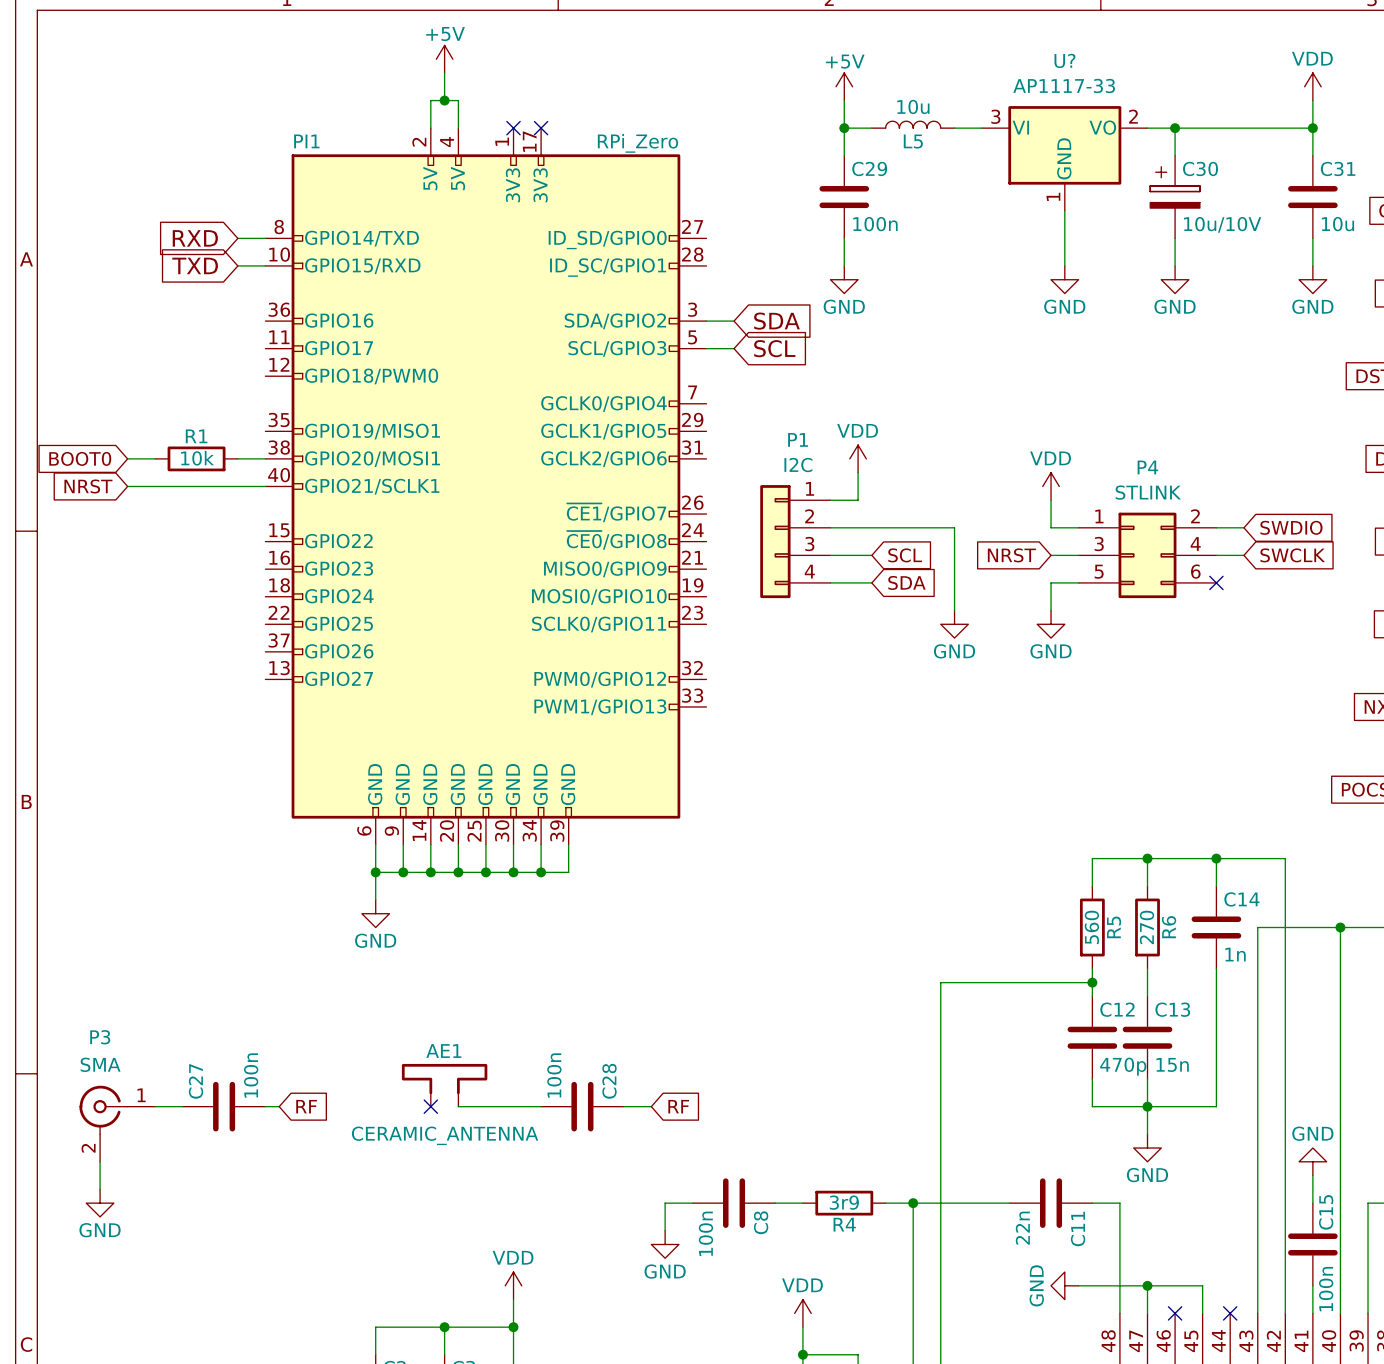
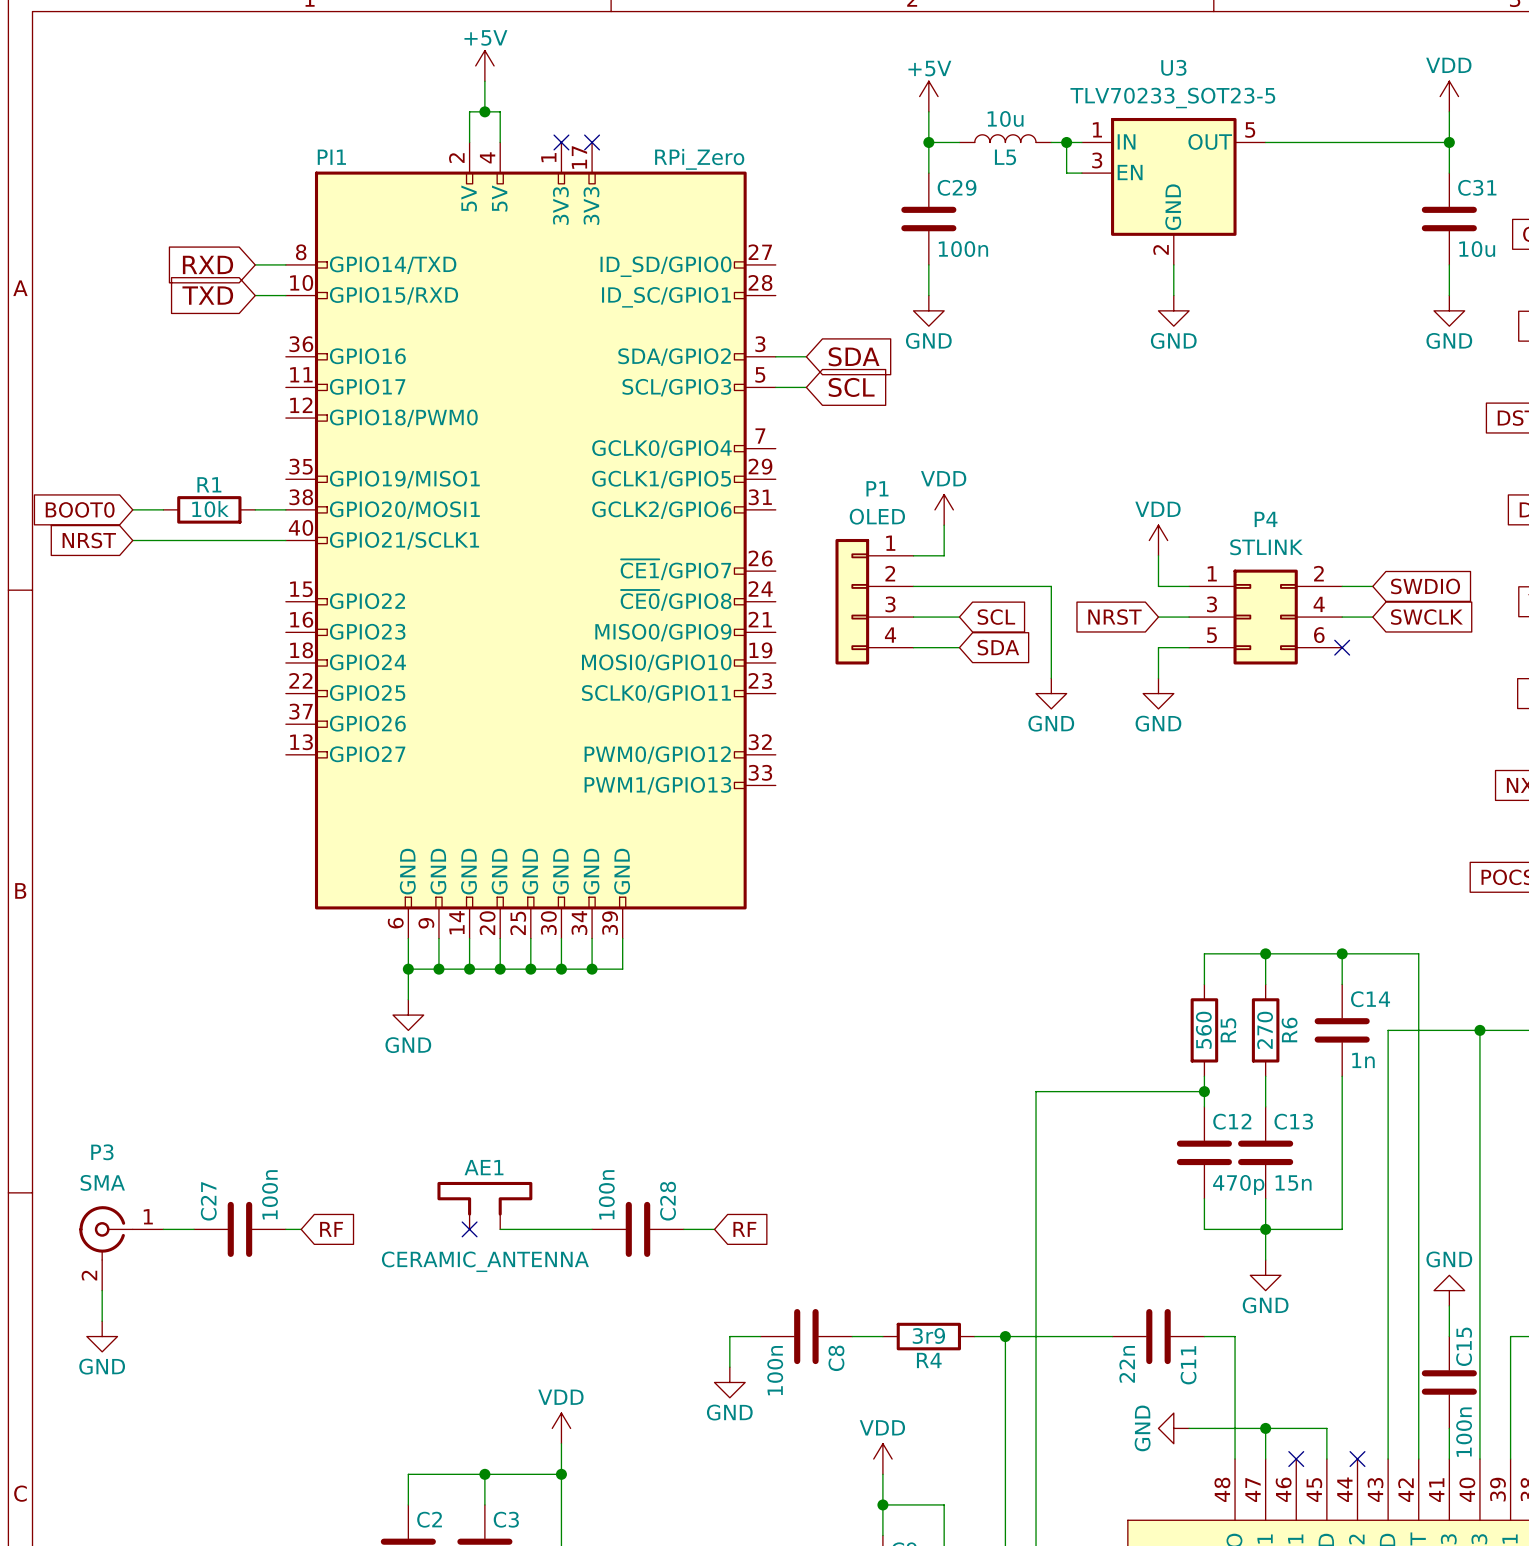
wire: none -> (1066, 142) (1066, 173) (1081, 173)
junction: none -> (1066, 142)
wire: (1175, 128) (1175, 155) -> none
junction: (1175, 128) -> none
U?: AP1117-33 (1064, 158) -> none
U3: none -> TLV70233_SOT23-5 (1173, 191)
C30: 10u/10V (1175, 197) -> none
wire: (1175, 238) (1175, 265) -> none
power symbol: GND (1175, 279) -> none
P1 value: I2C (798, 465) -> OLED (877, 516)

